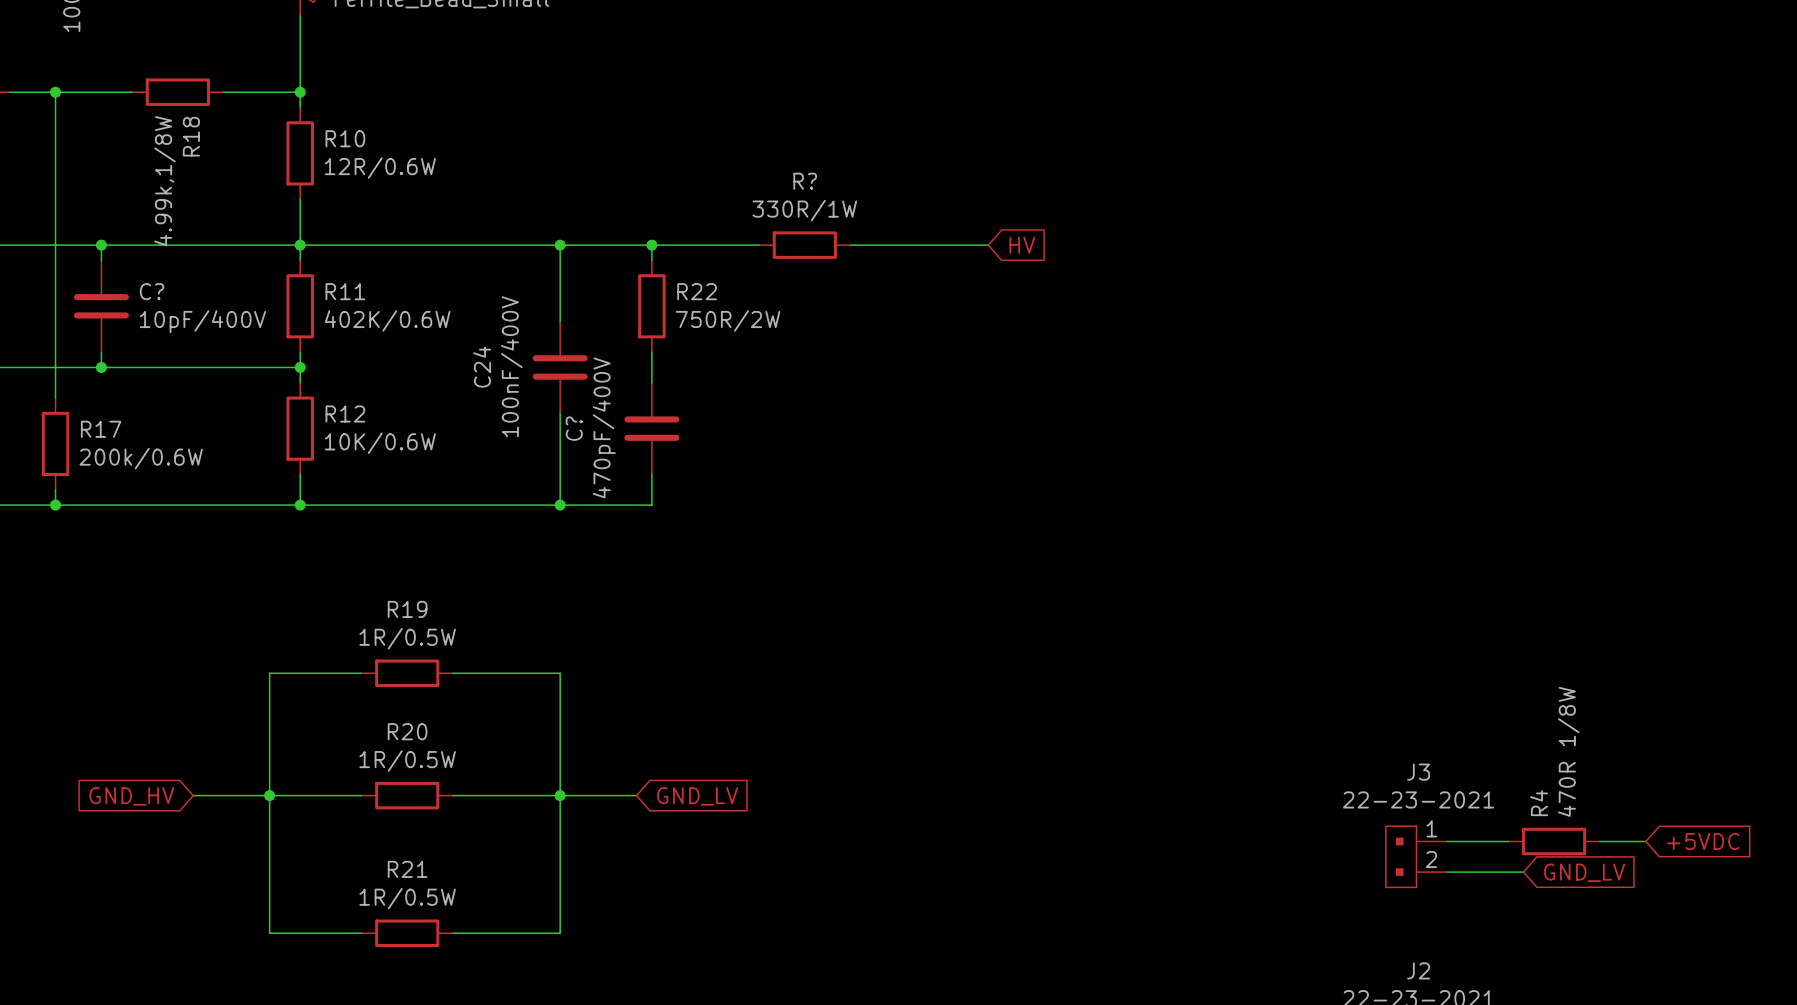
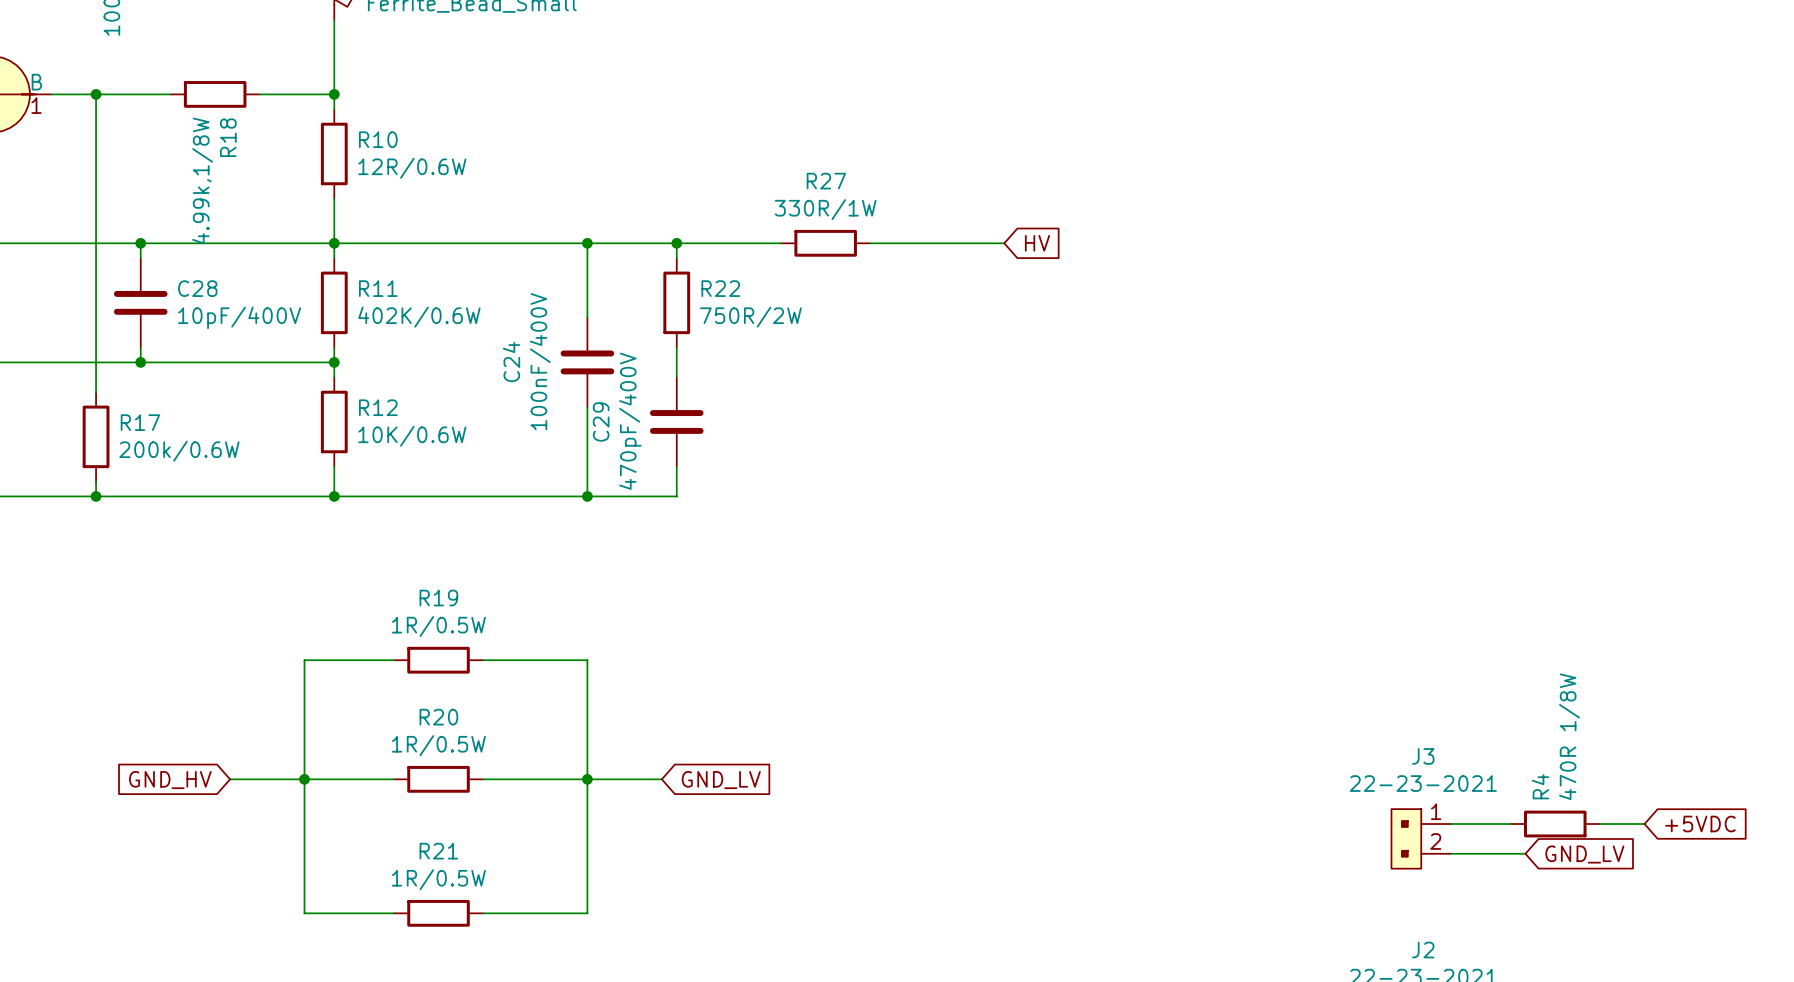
R? name: R? (805, 181) -> R27 (826, 181)
C? name: C? (151, 291) -> C28 (197, 288)
C? name: C? (574, 428) -> C29 (601, 421)

